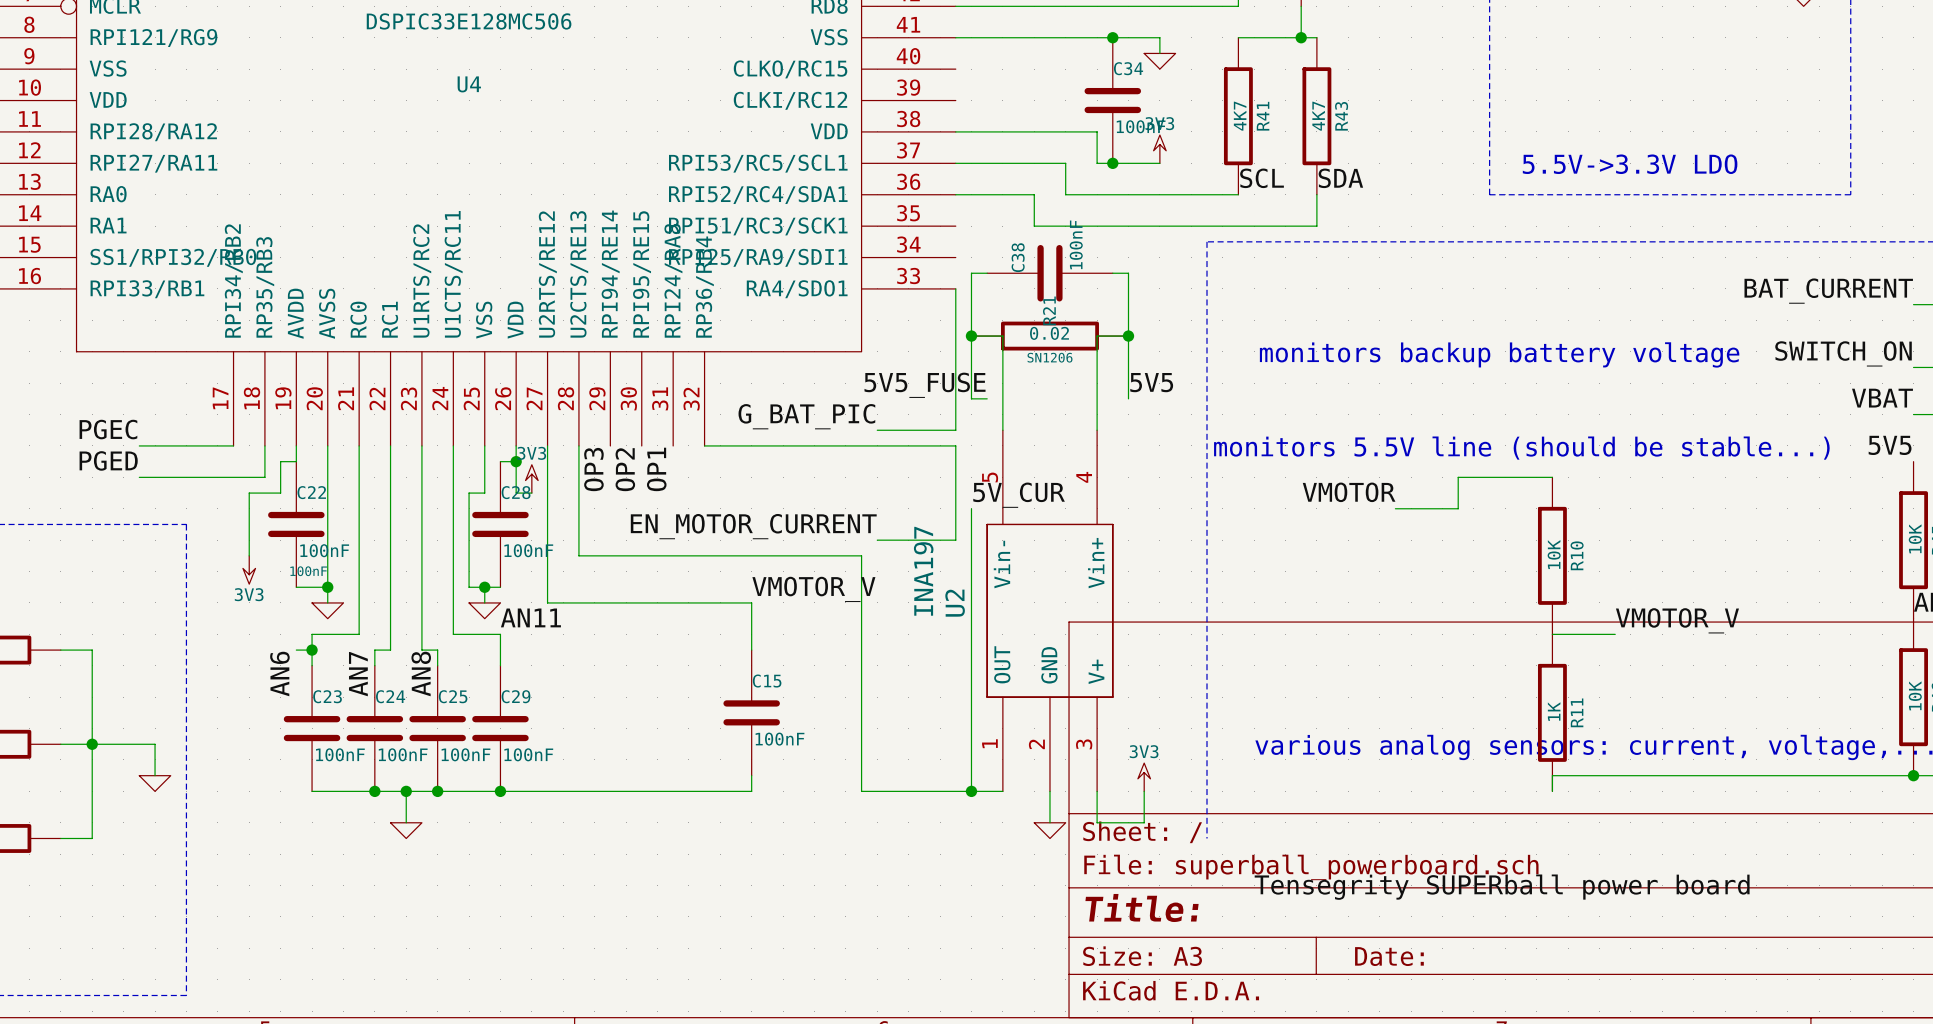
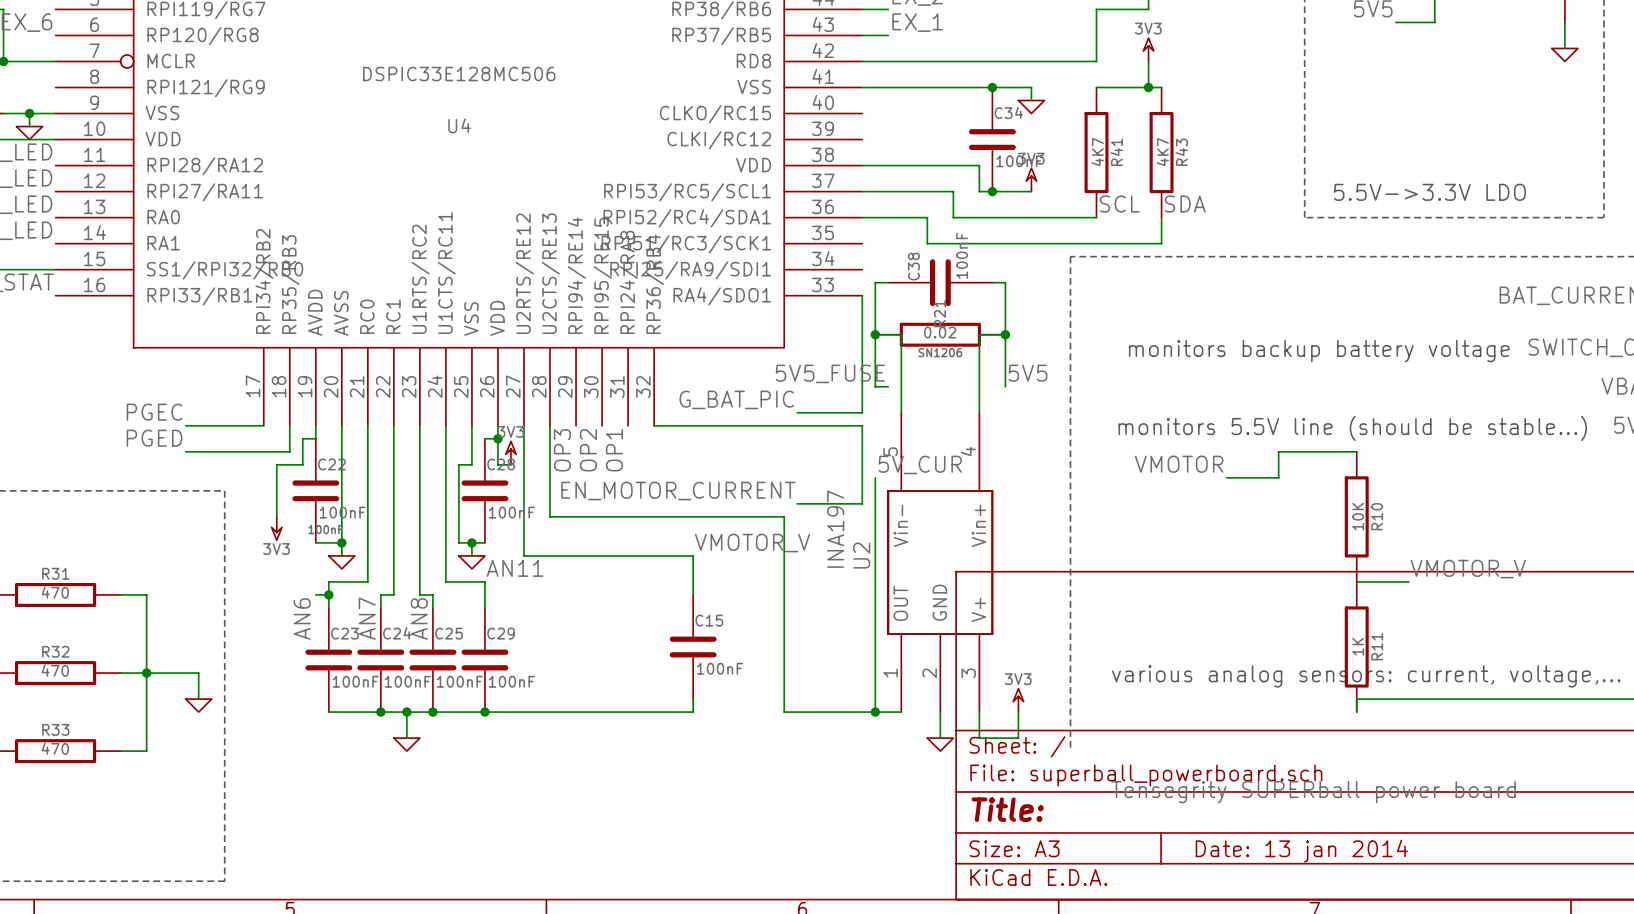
title block: Date: (1389, 956) -> Date: 13 jan 2014 (1301, 850)

